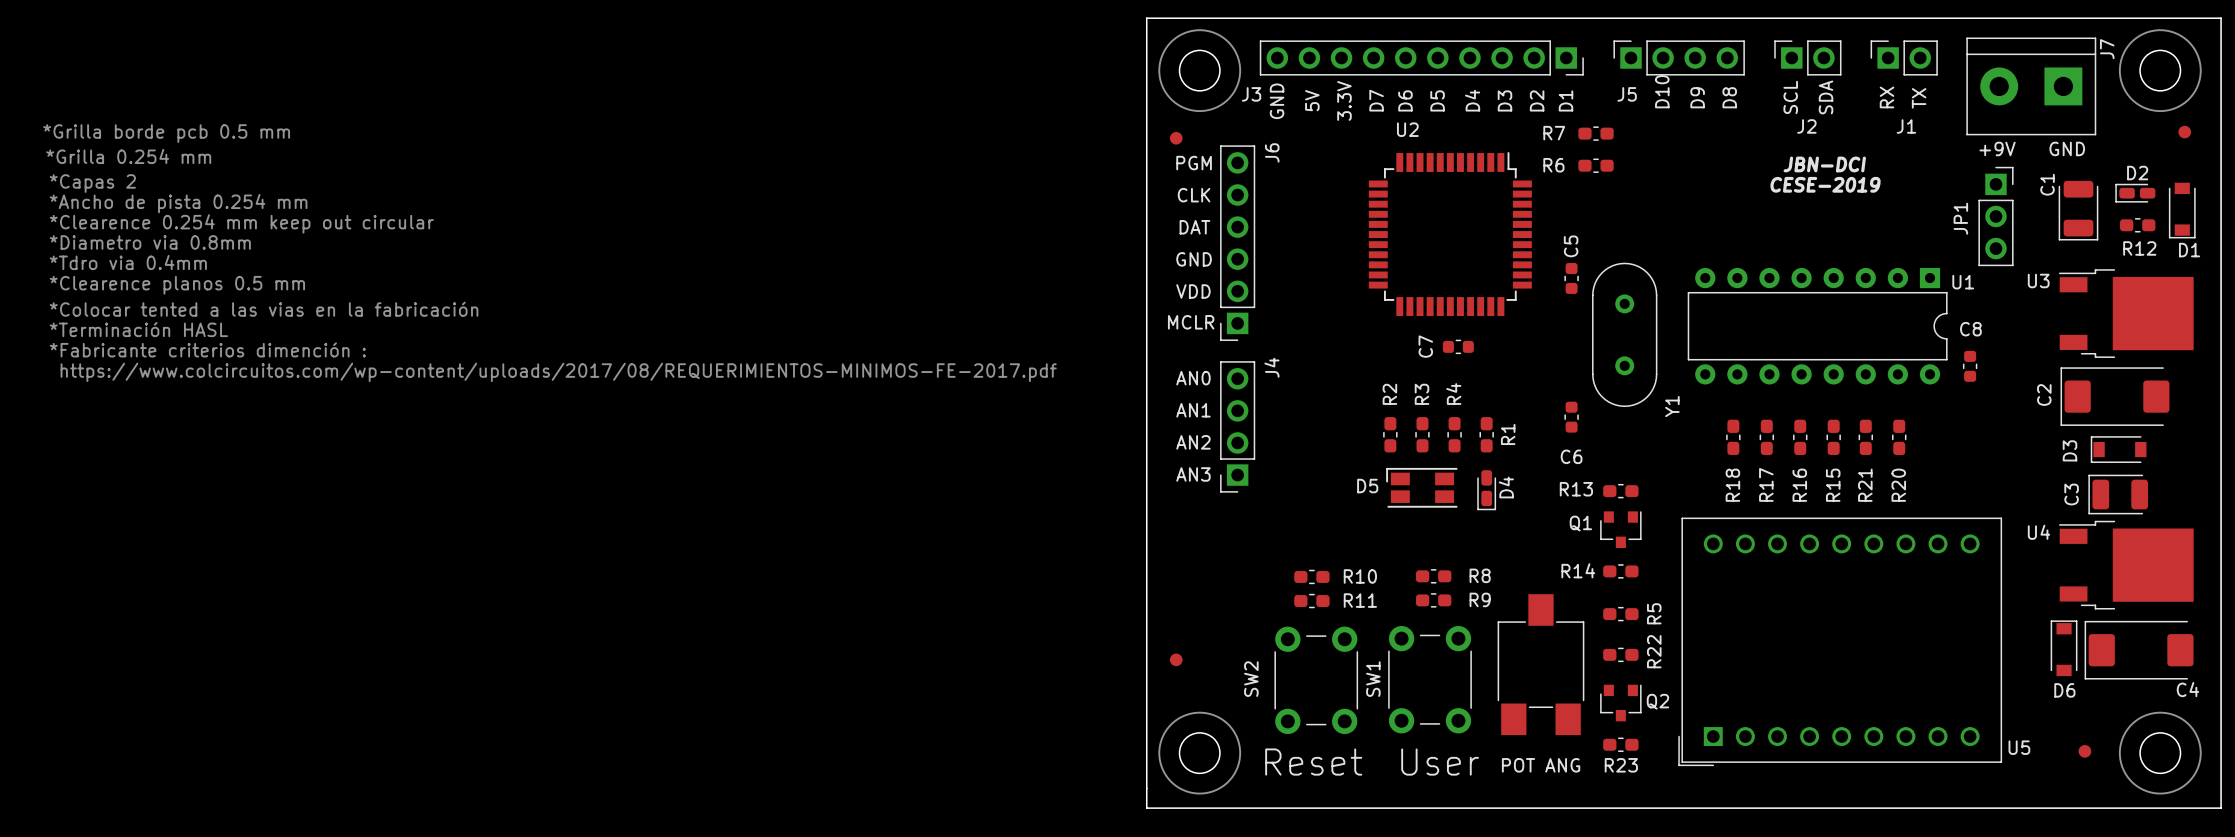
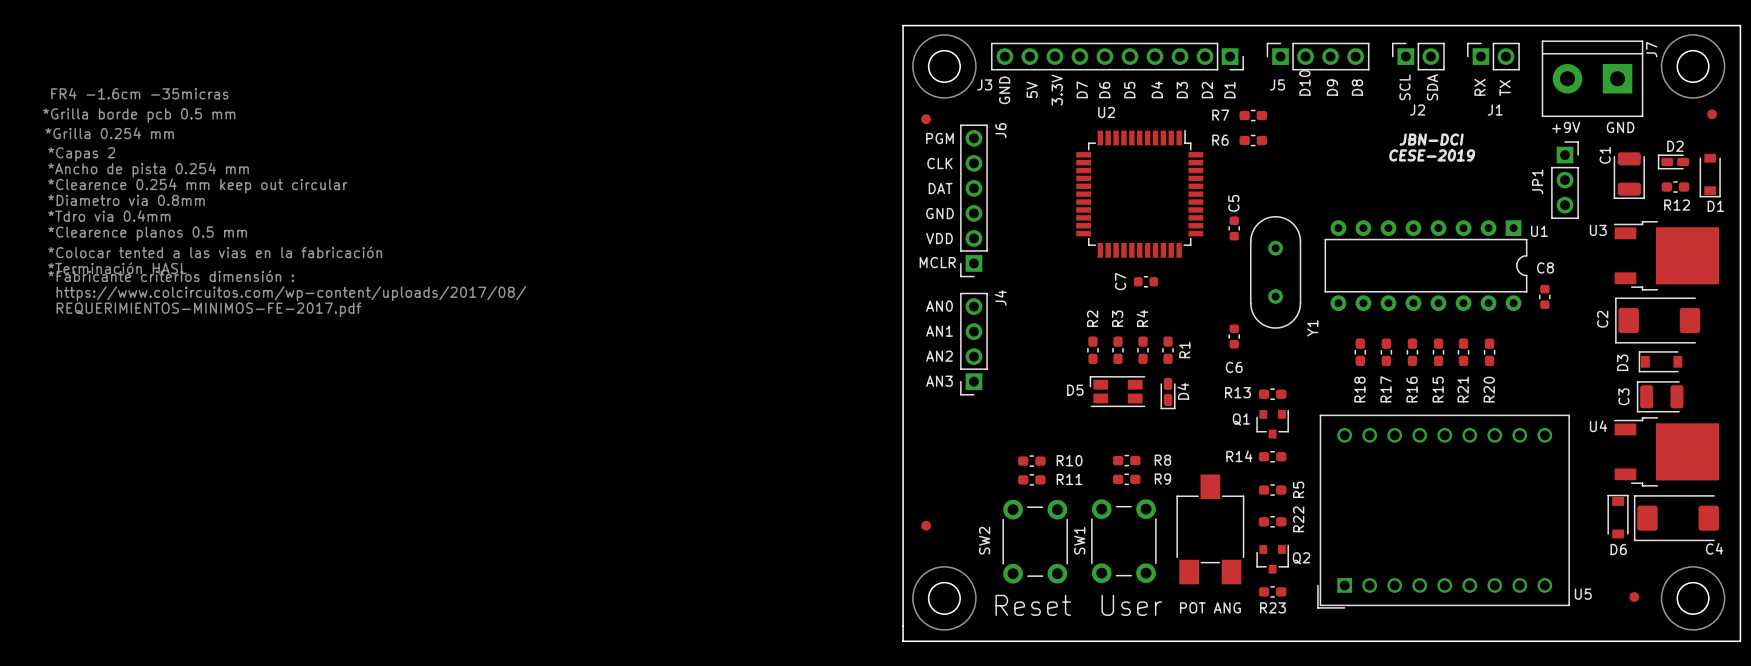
text: none -> FR4 -1.6cm -35micras (139, 93)
text: *Fabricante criterios dimención : (207, 349) -> *Fabricante criterios dimensión : (171, 276)
text: https://www.colcircuitos.com/wp-content/uploads/2017/08/REQUERIMIENTOS-MINIMOS-FE-2017.pdf (558, 372) -> https://www.colcircuitos.com/wp-content/uploads/2017/08/ (291, 293)
text: none -> REQUERIMIENTOS-MINIMOS-FE-2017.pdf (209, 309)

